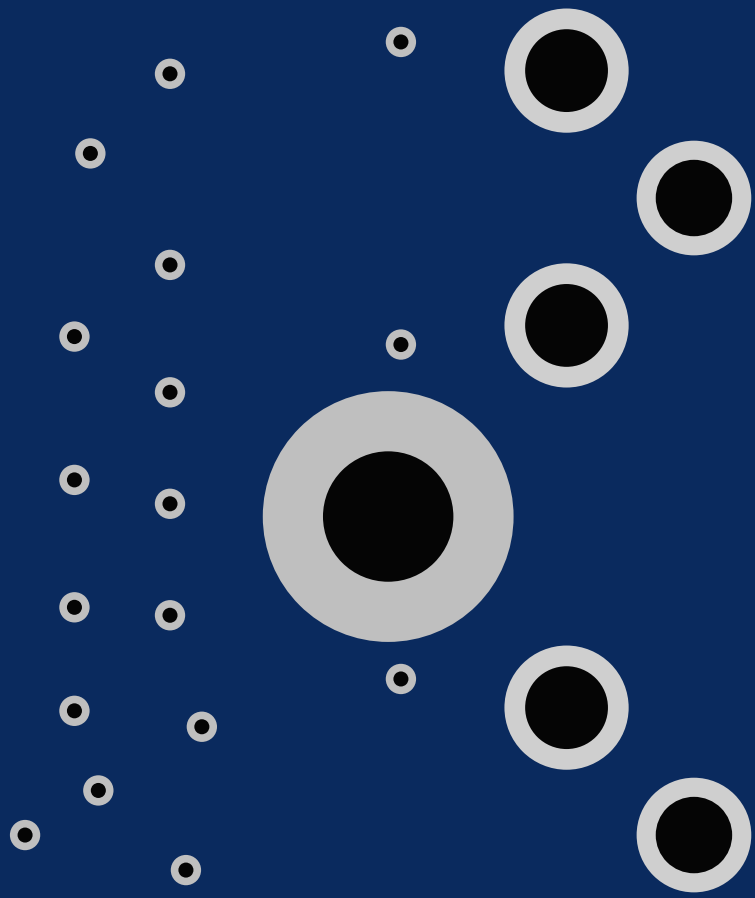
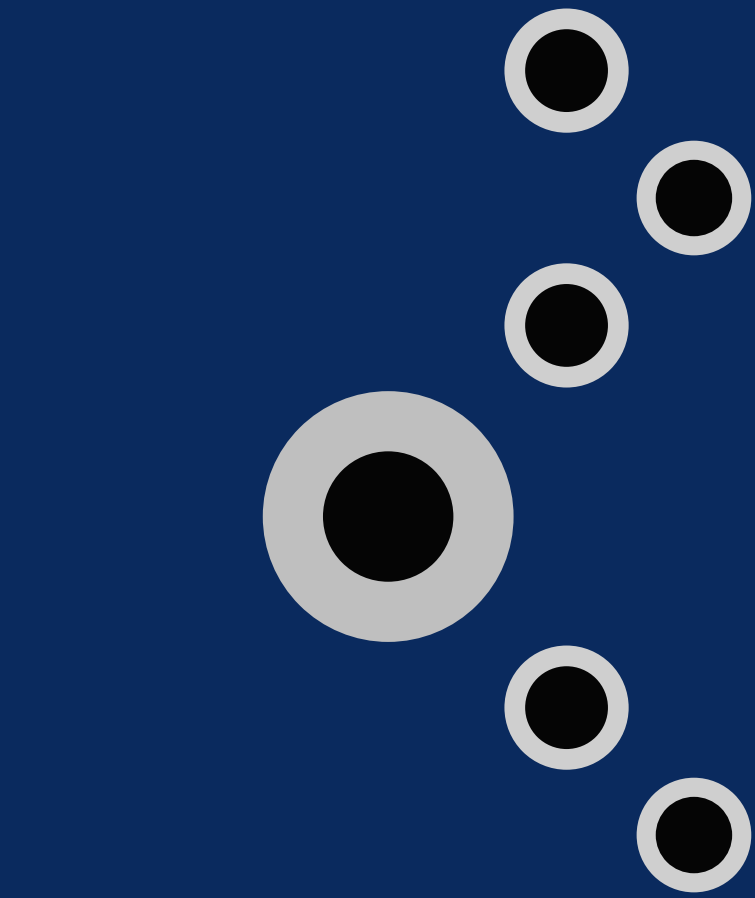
via: (400, 41) -> none
via: (170, 73) -> none
via: (90, 153) -> none
via: (170, 264) -> none
via: (74, 336) -> none
via: (400, 344) -> none
via: (170, 392) -> none
via: (74, 479) -> none
via: (170, 503) -> none
via: (74, 607) -> none
via: (170, 615) -> none
via: (400, 678) -> none
via: (74, 710) -> none
via: (201, 726) -> none
via: (98, 790) -> none
via: (25, 835) -> none
via: (185, 870) -> none

